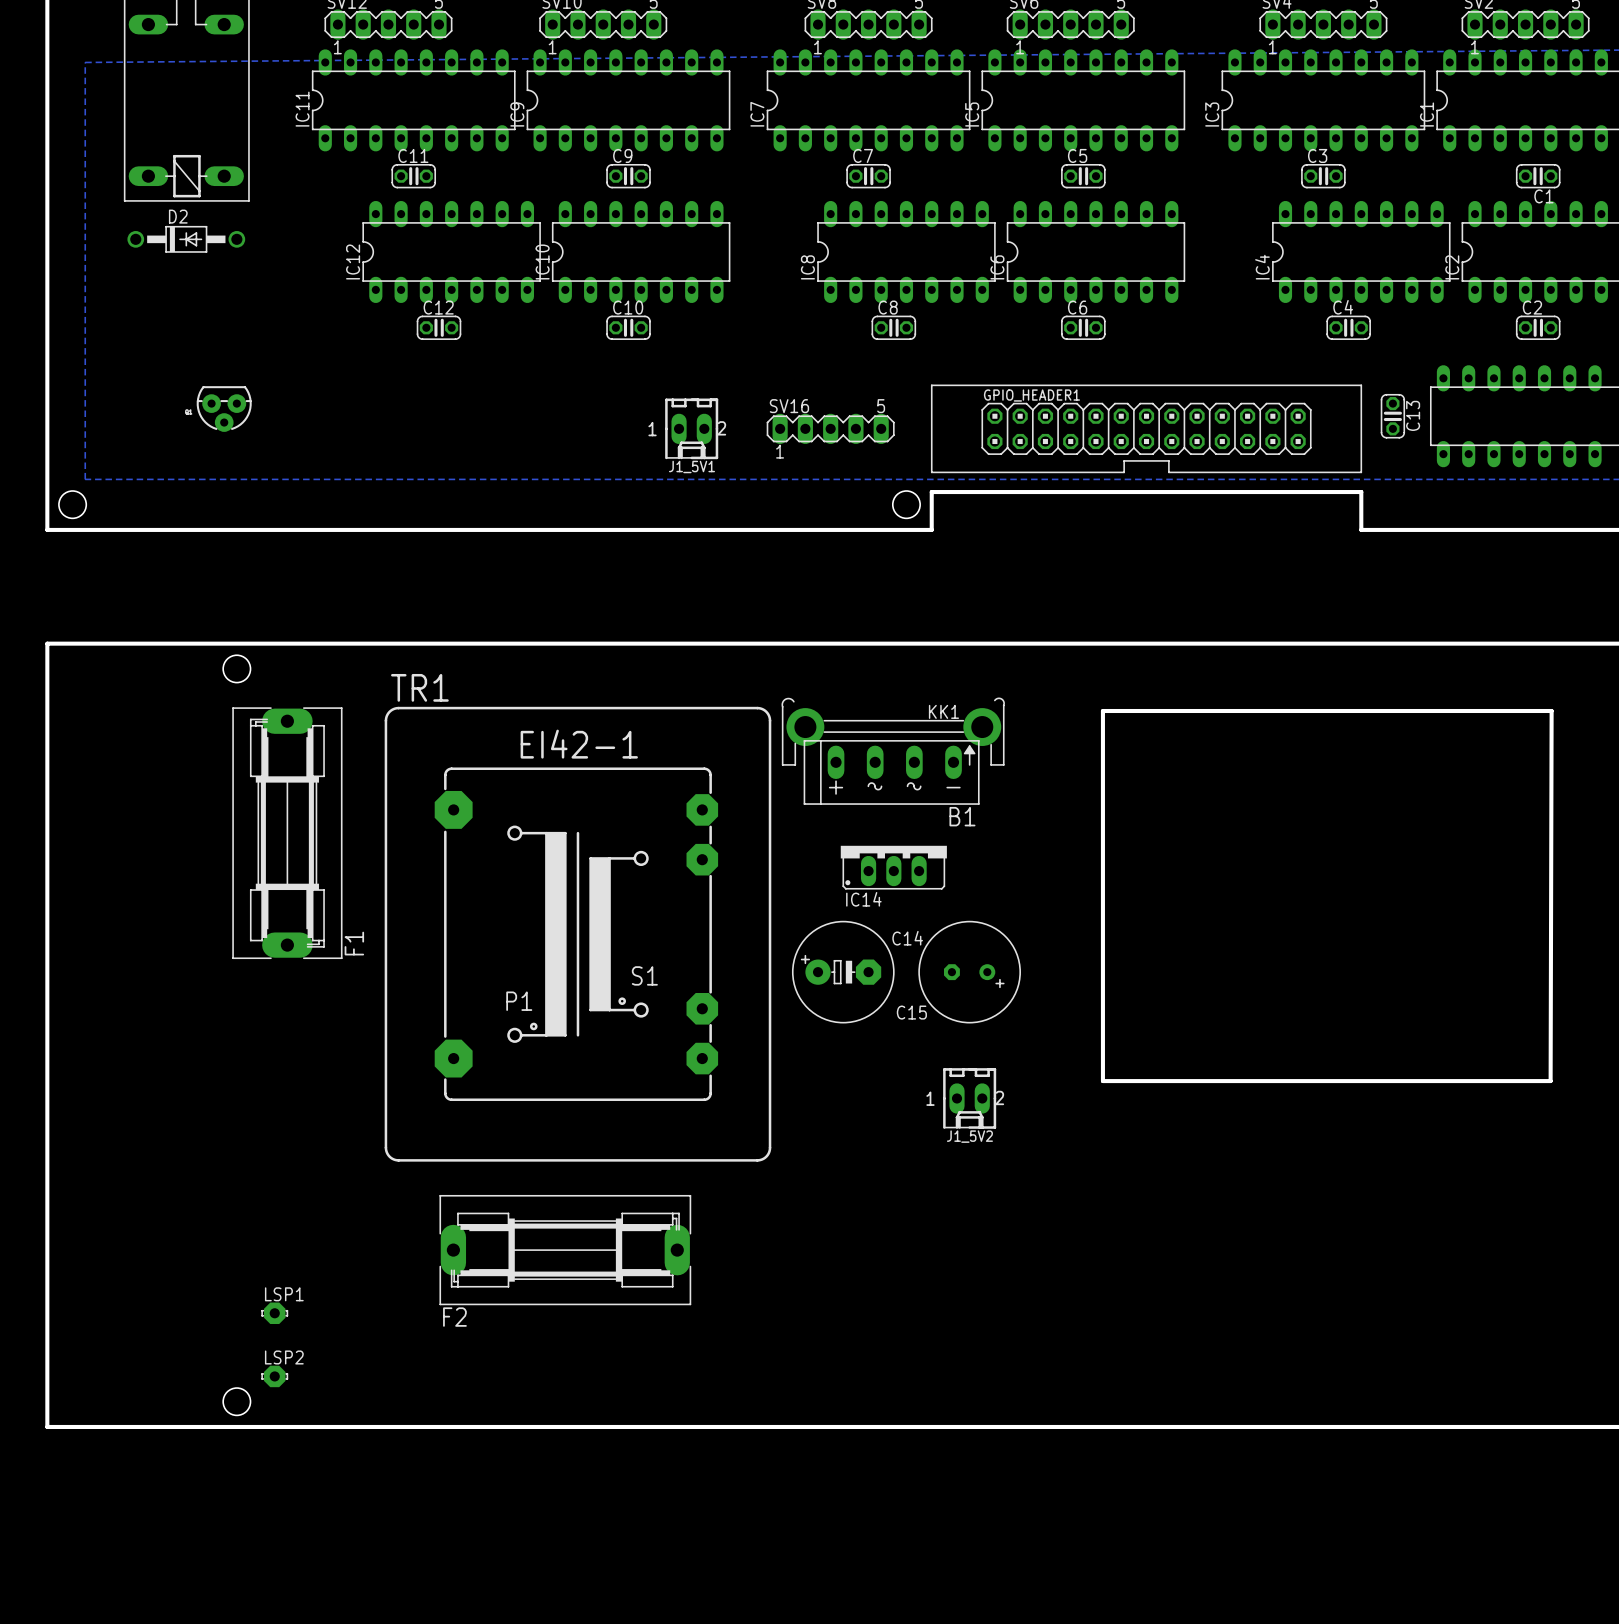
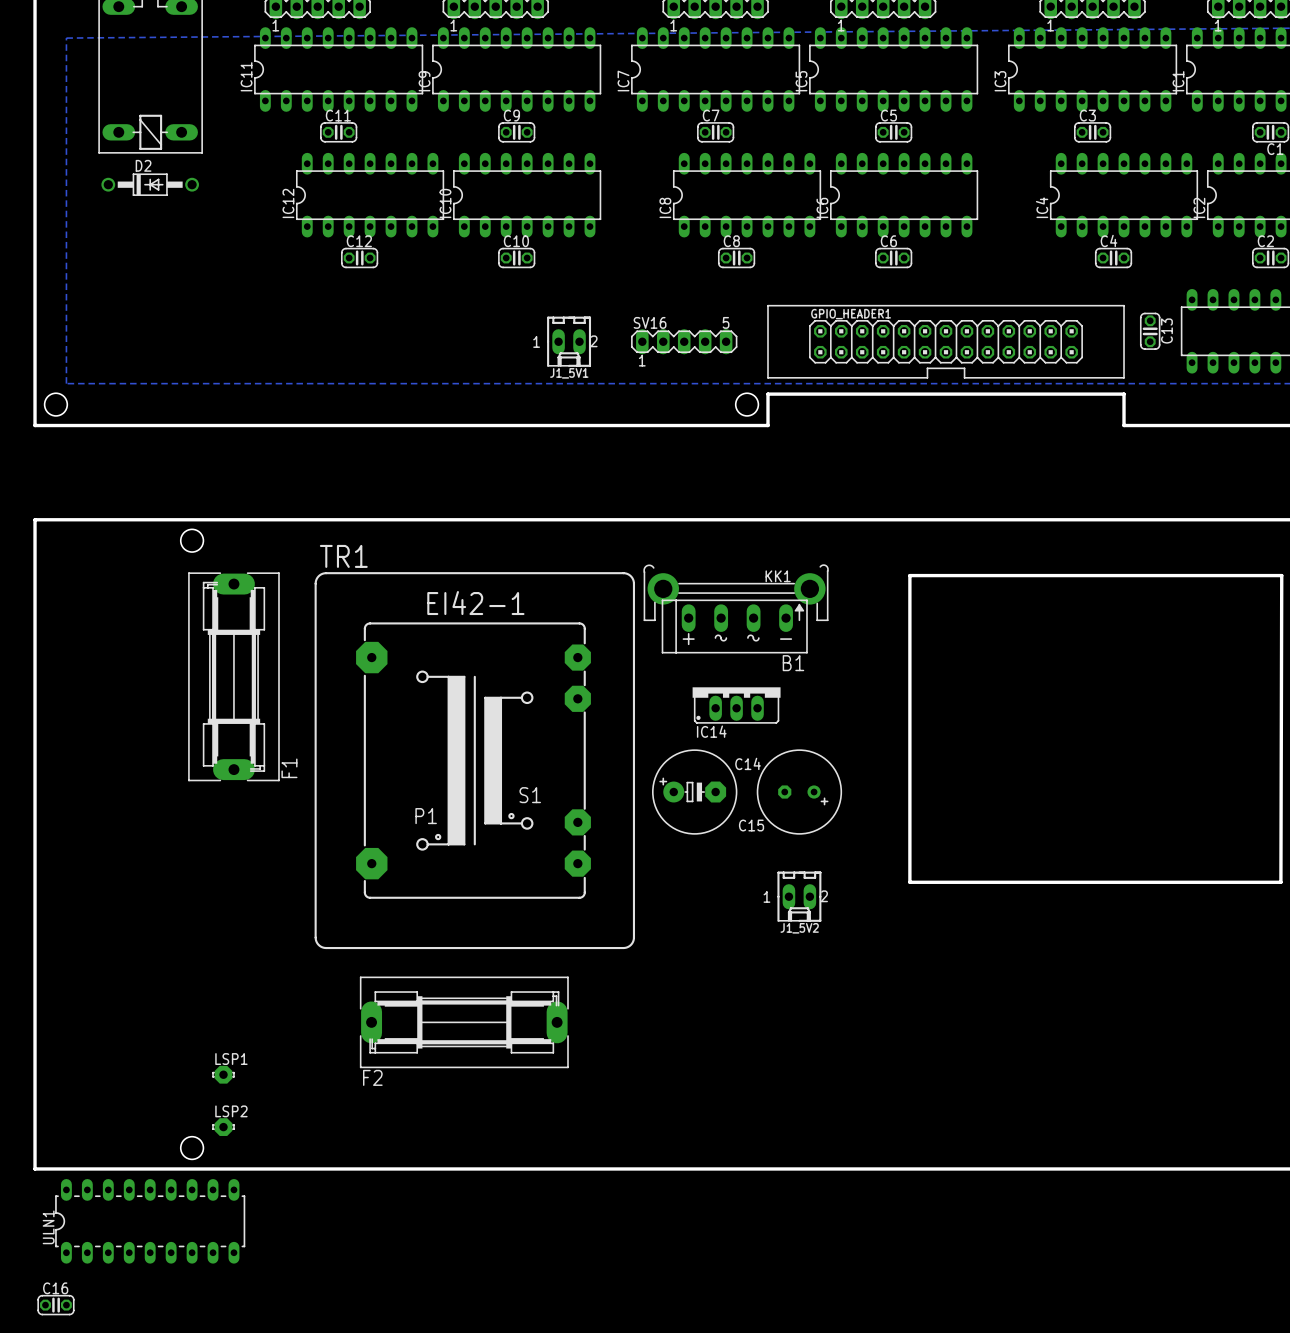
part: (224, 409) -> none
ULN1: none -> (150, 1221)
C16: none -> (55, 1305)

